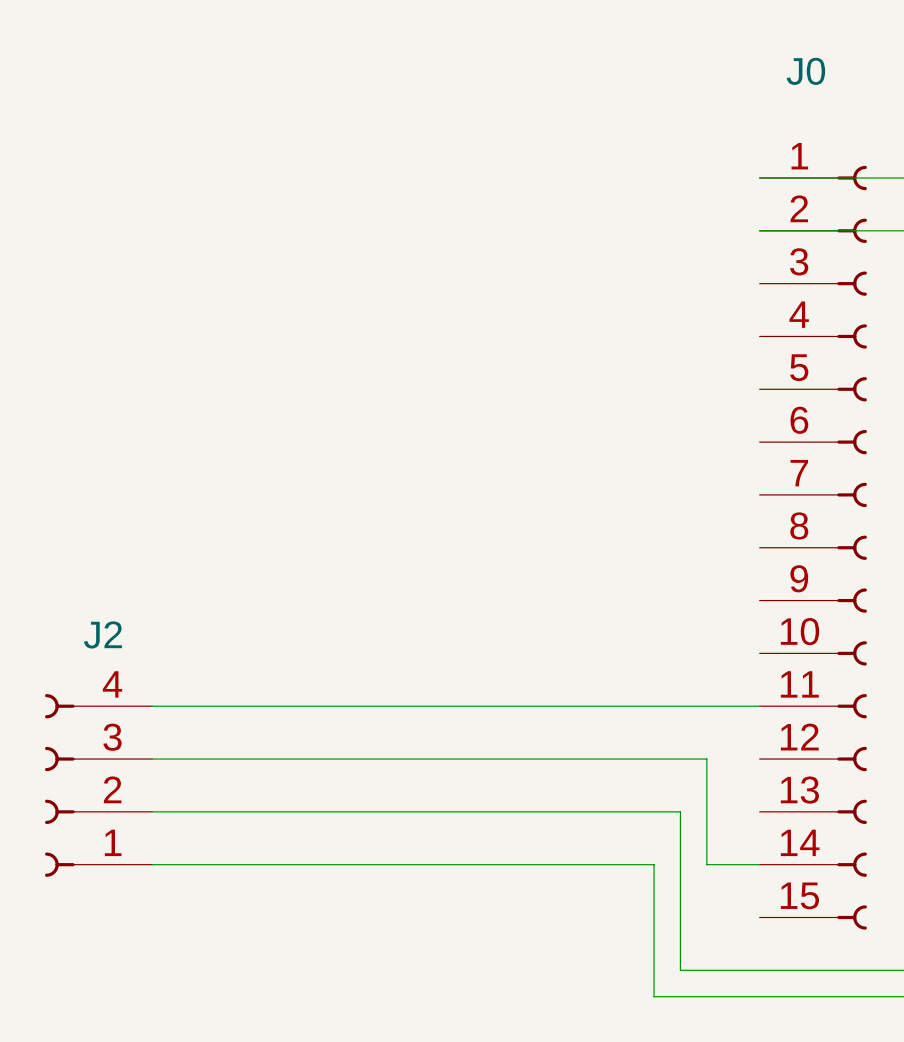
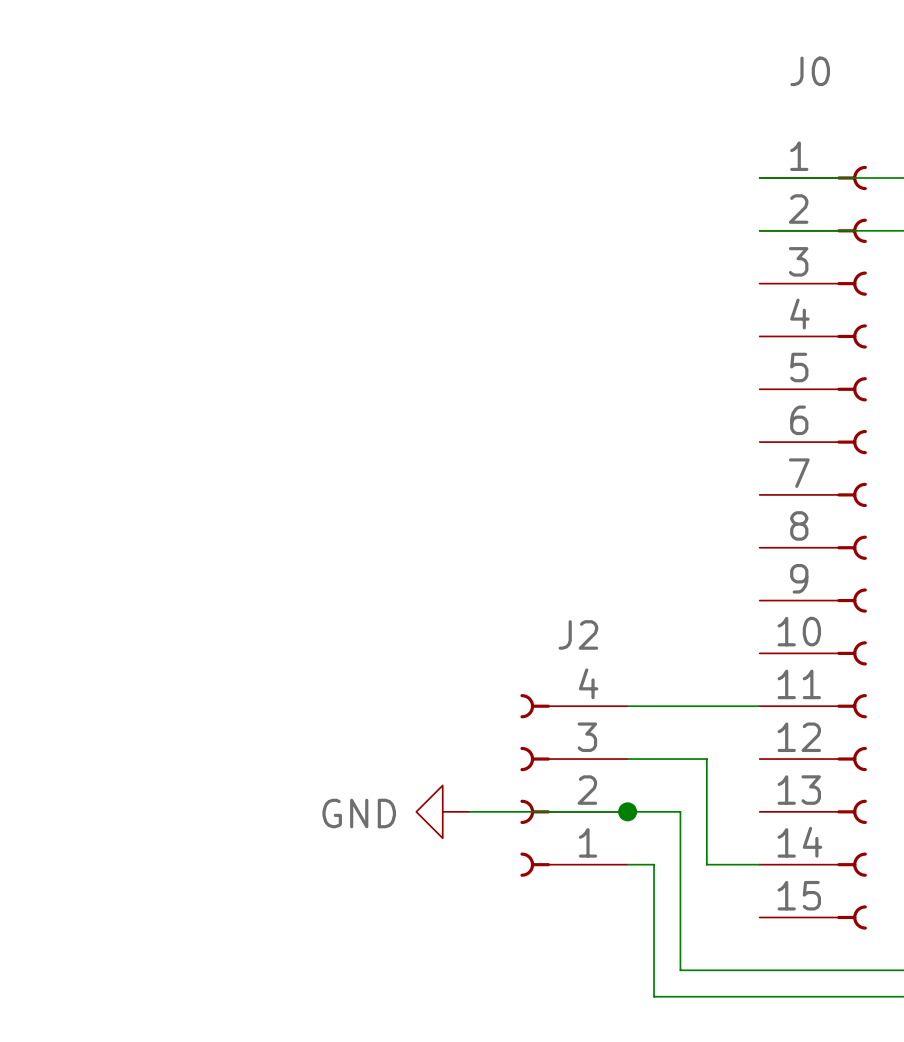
wire: (152, 706) (627, 706) -> none
wire: (152, 759) (627, 759) -> none
J2 position: (98, 785) -> (574, 785)
wire: (152, 811) (469, 811) -> none
power symbol: none -> GND (442, 811)
junction: none -> (627, 811)
wire: (152, 864) (627, 864) -> none

